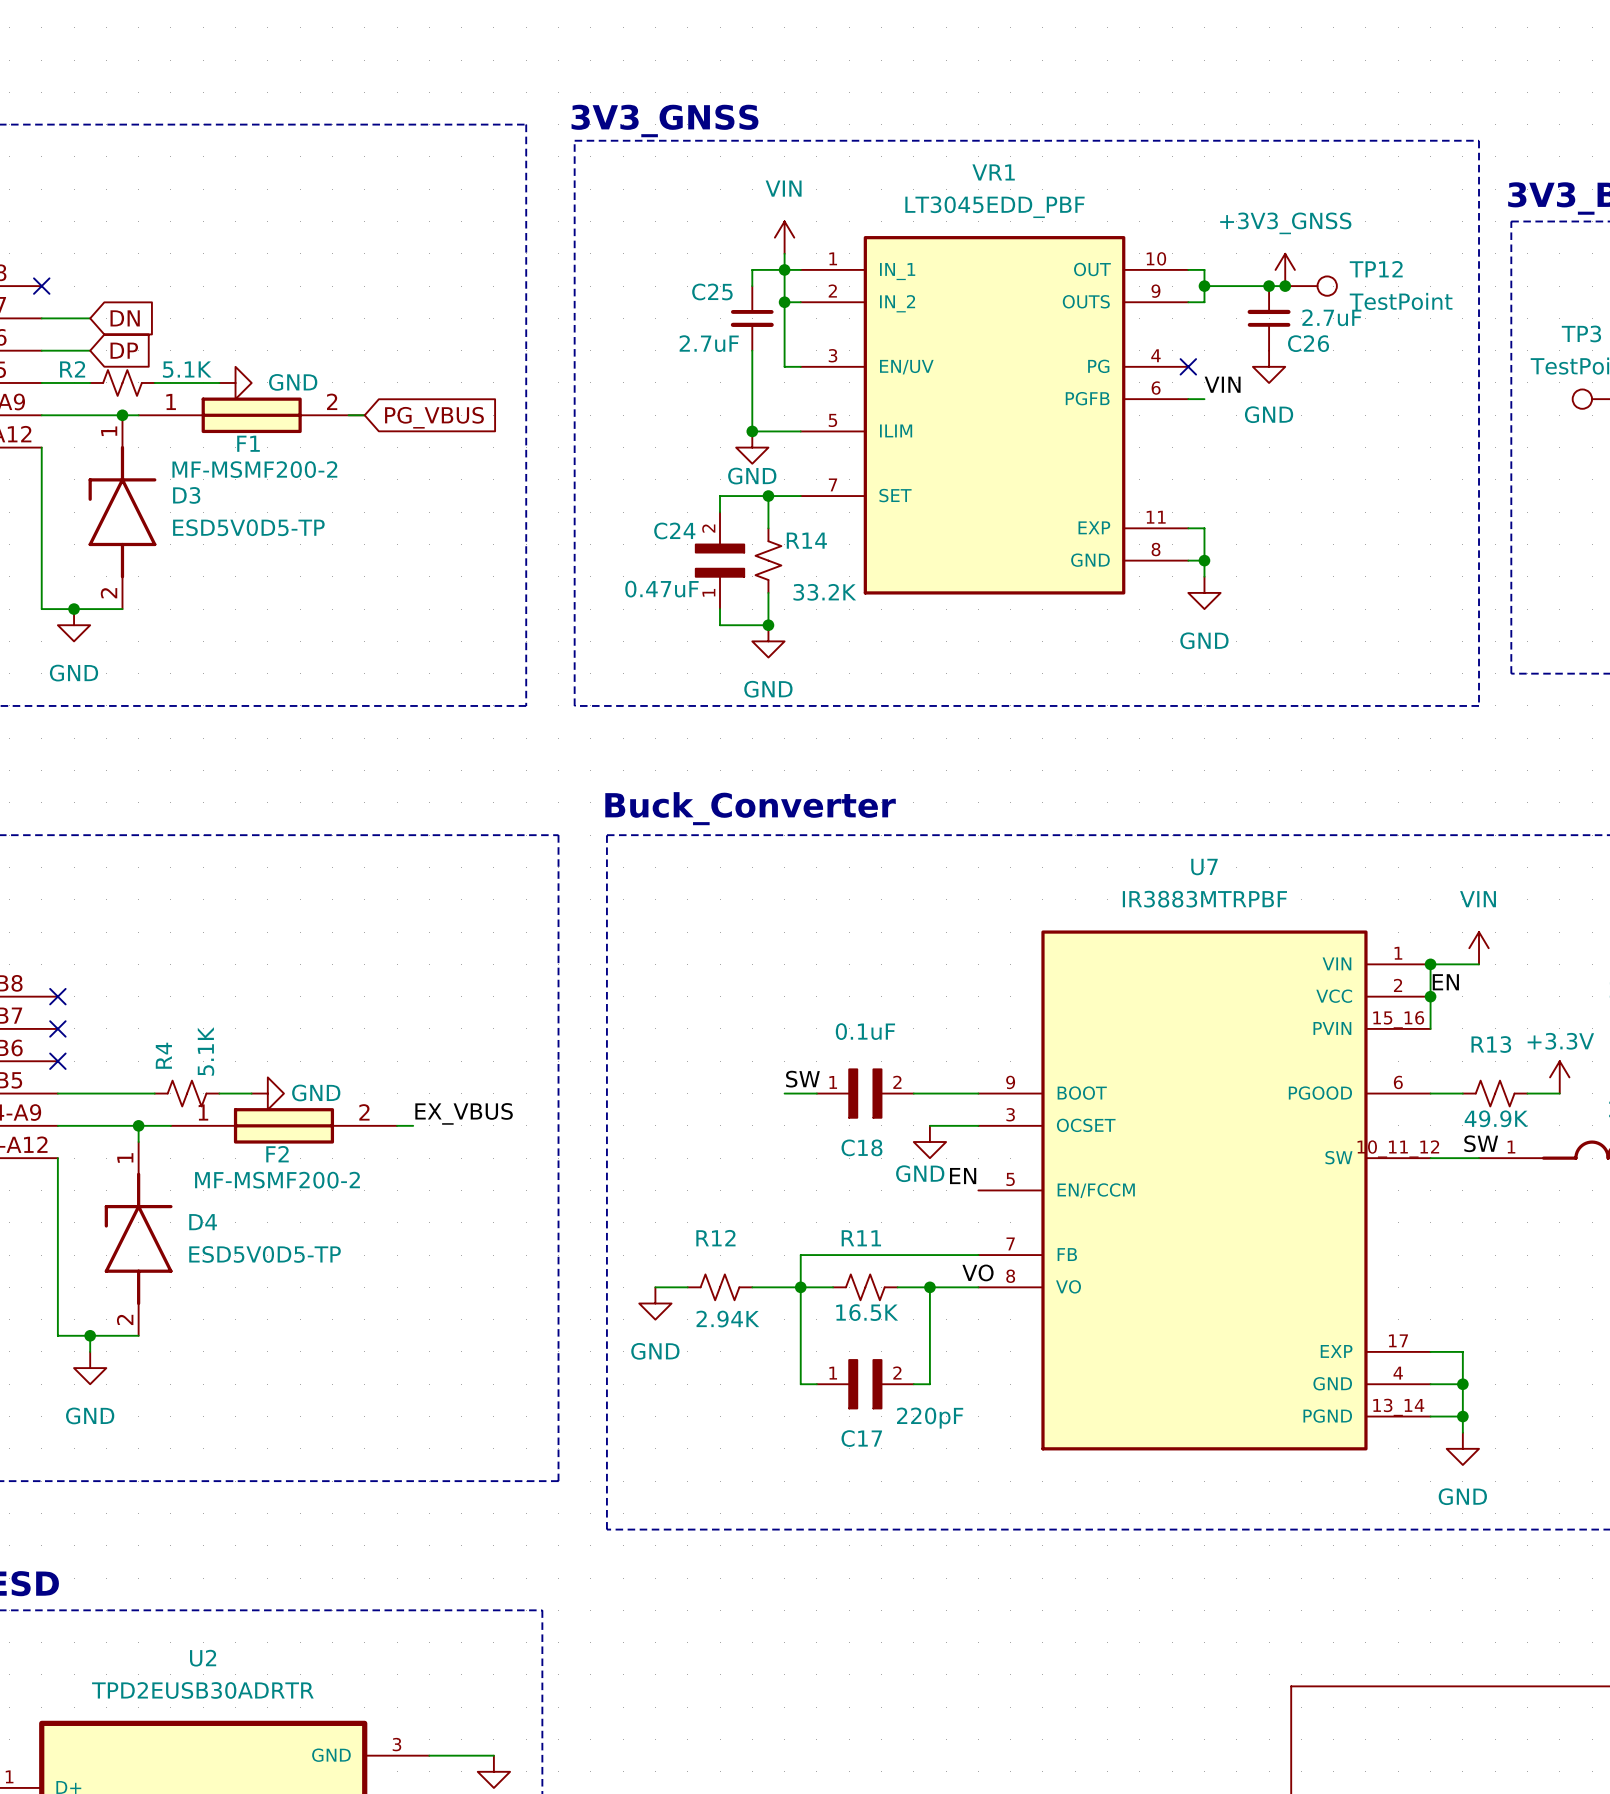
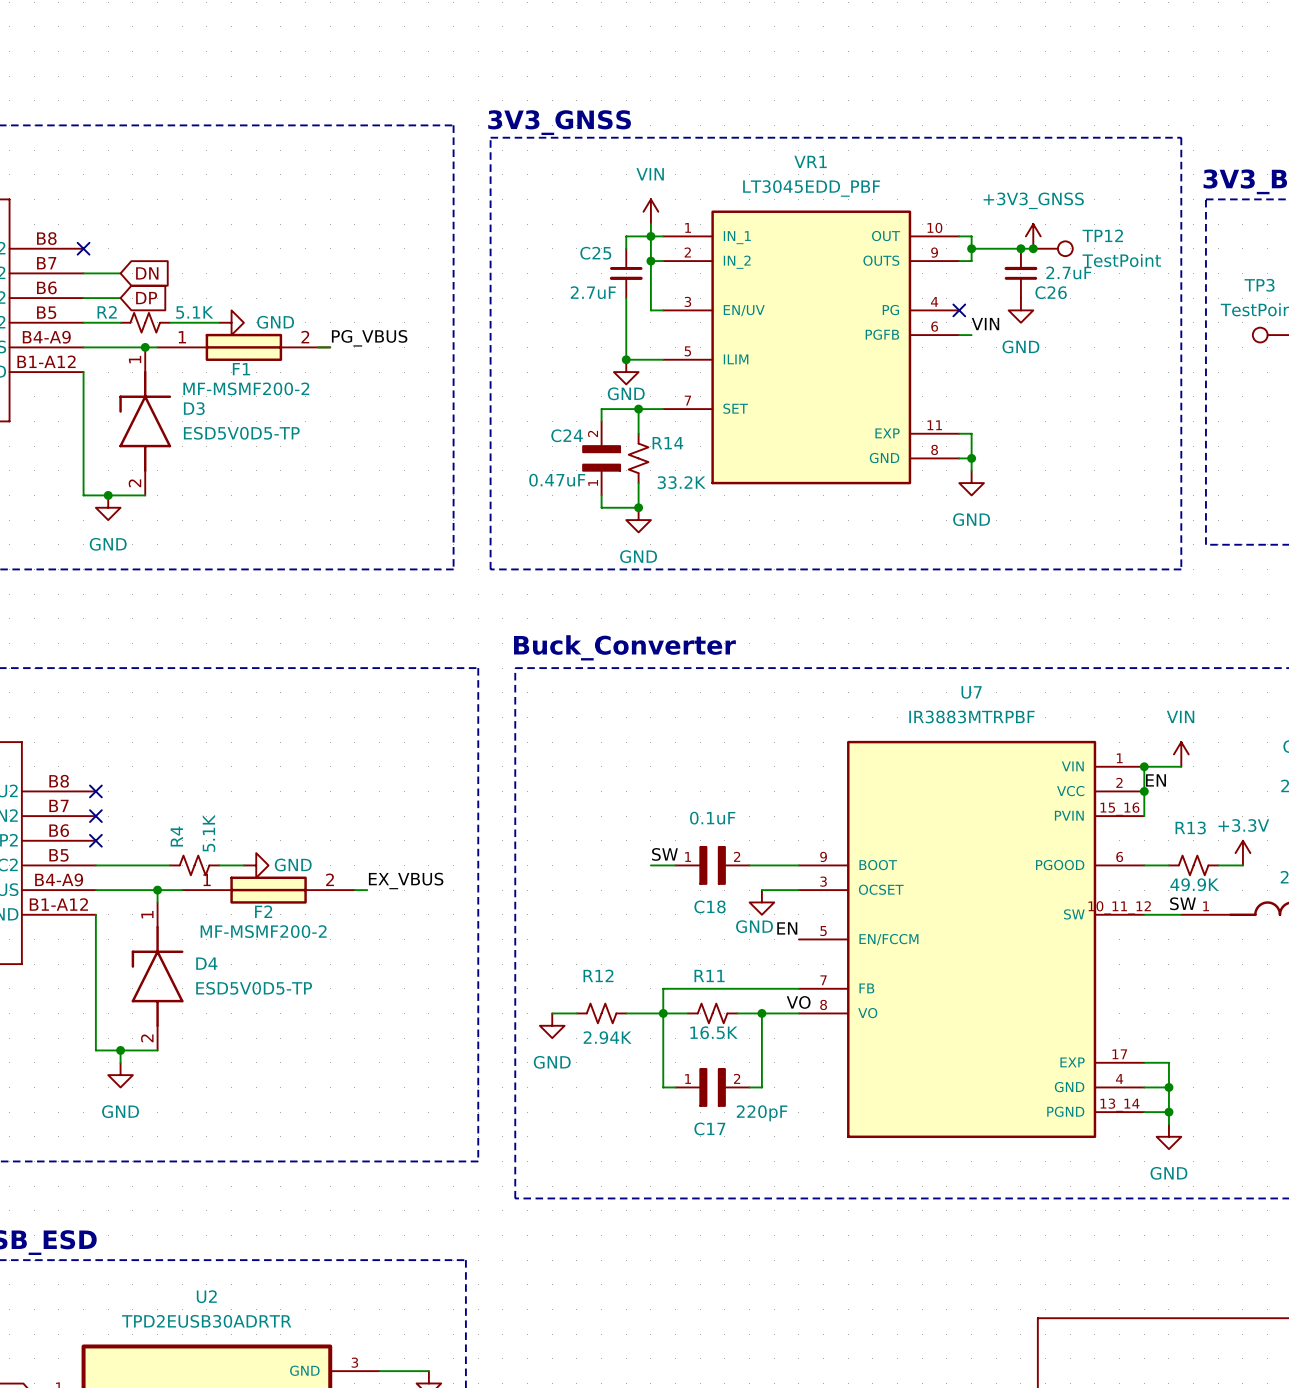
label: none -> PG_VBUS (369, 338)
global label: PG_VBUS (434, 417) -> none

